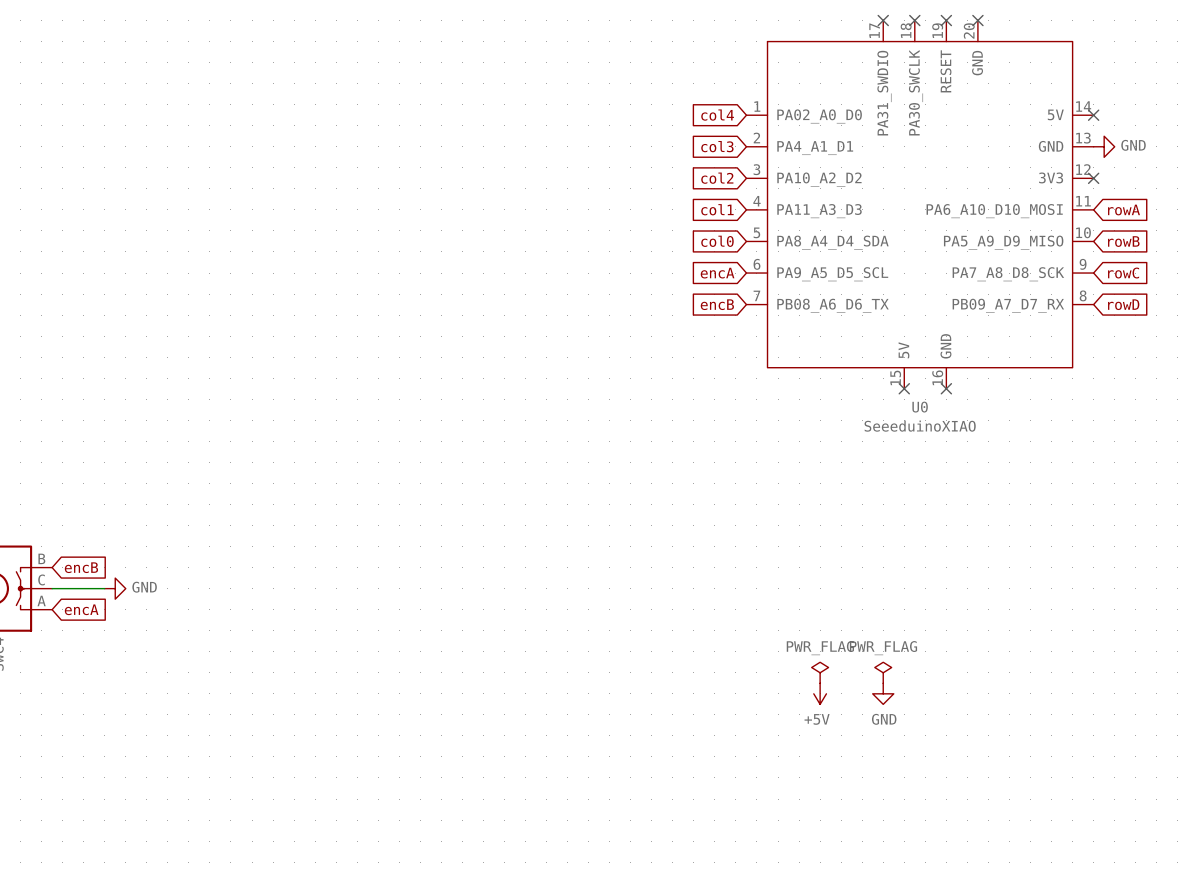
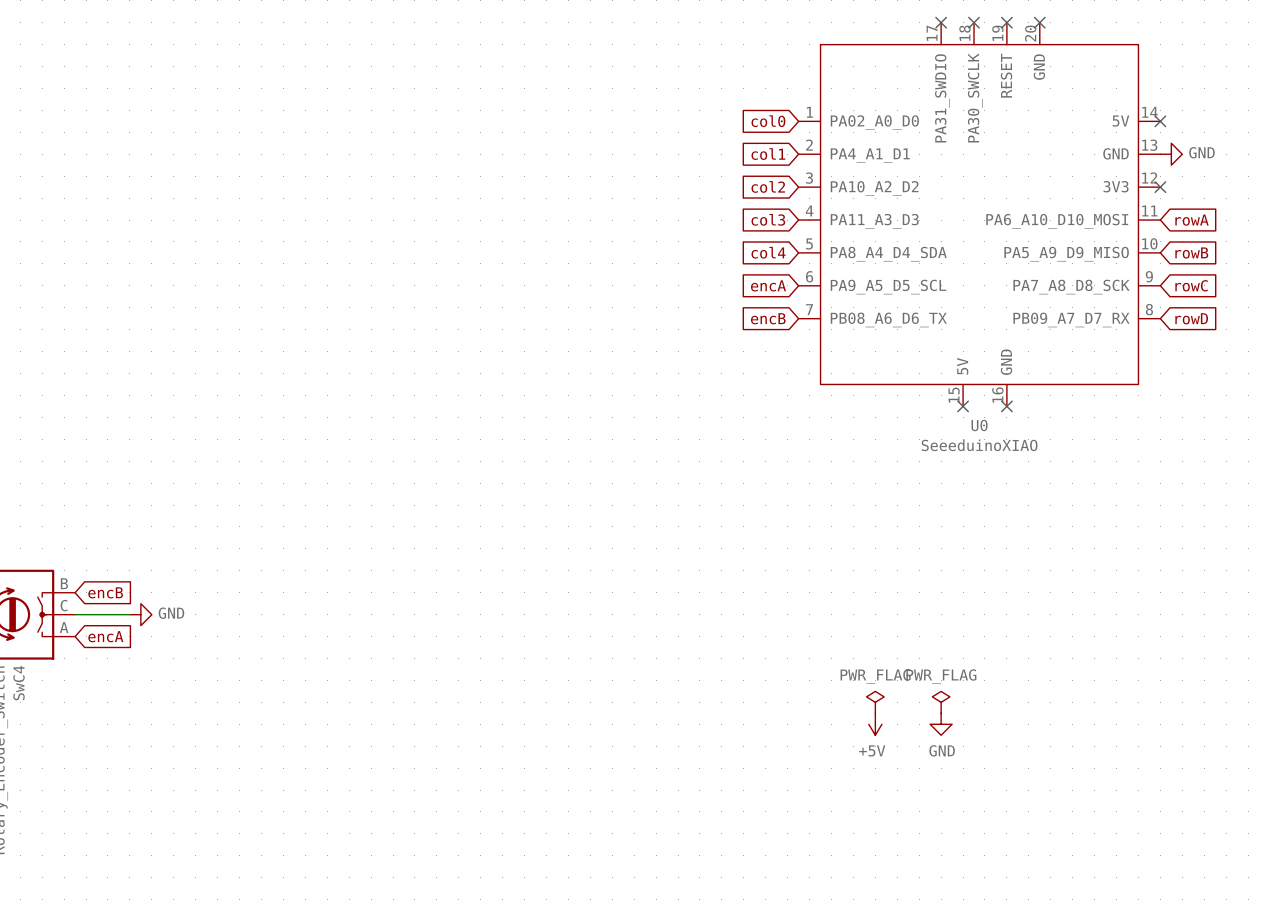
global label: col4 (717, 115) -> col0 (768, 121)
global label: col3 (717, 146) -> col1 (768, 154)
global label: col1 (717, 209) -> col3 (768, 219)
global label: col0 (717, 241) -> col4 (768, 252)

